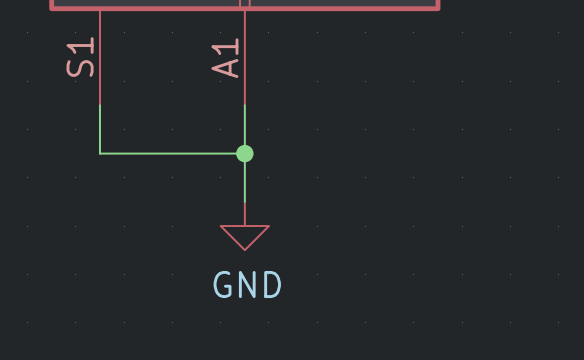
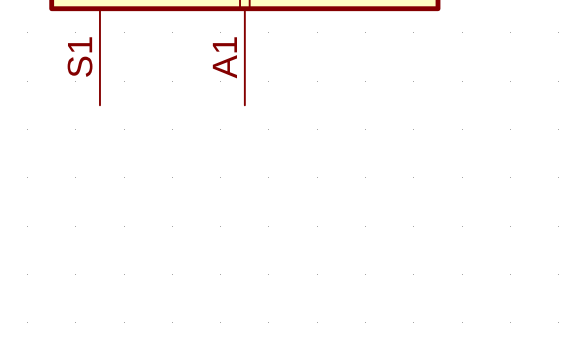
wire: (99, 105) (99, 153) (244, 153) -> none
wire: (244, 105) (244, 201) -> none
junction: (244, 153) -> none
power symbol: GND (244, 226) -> none

